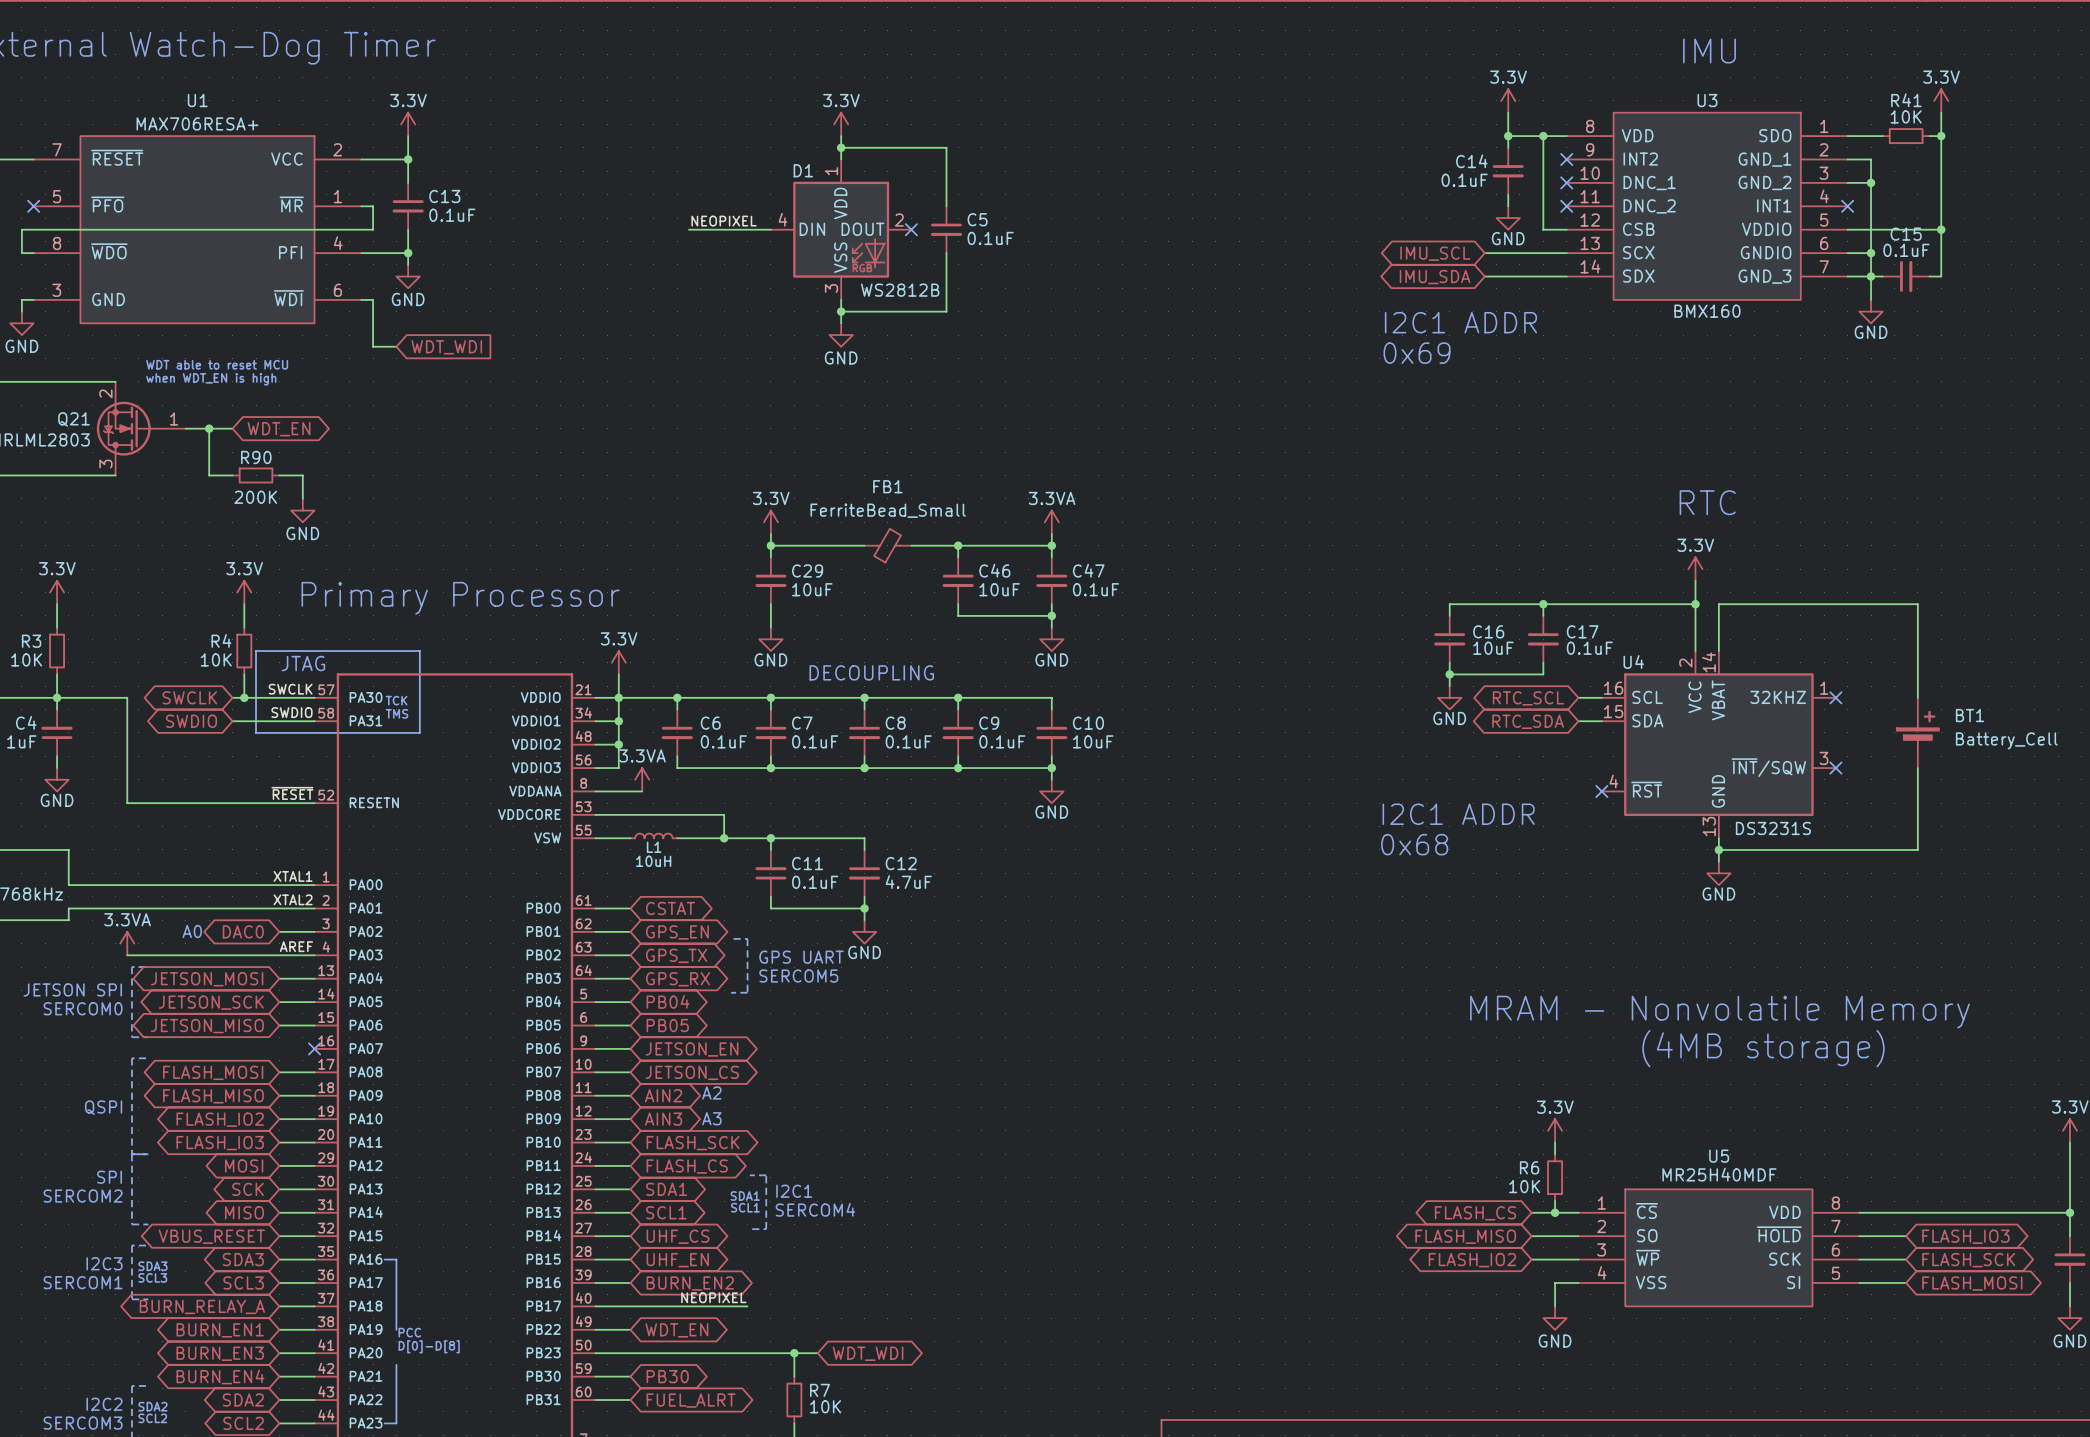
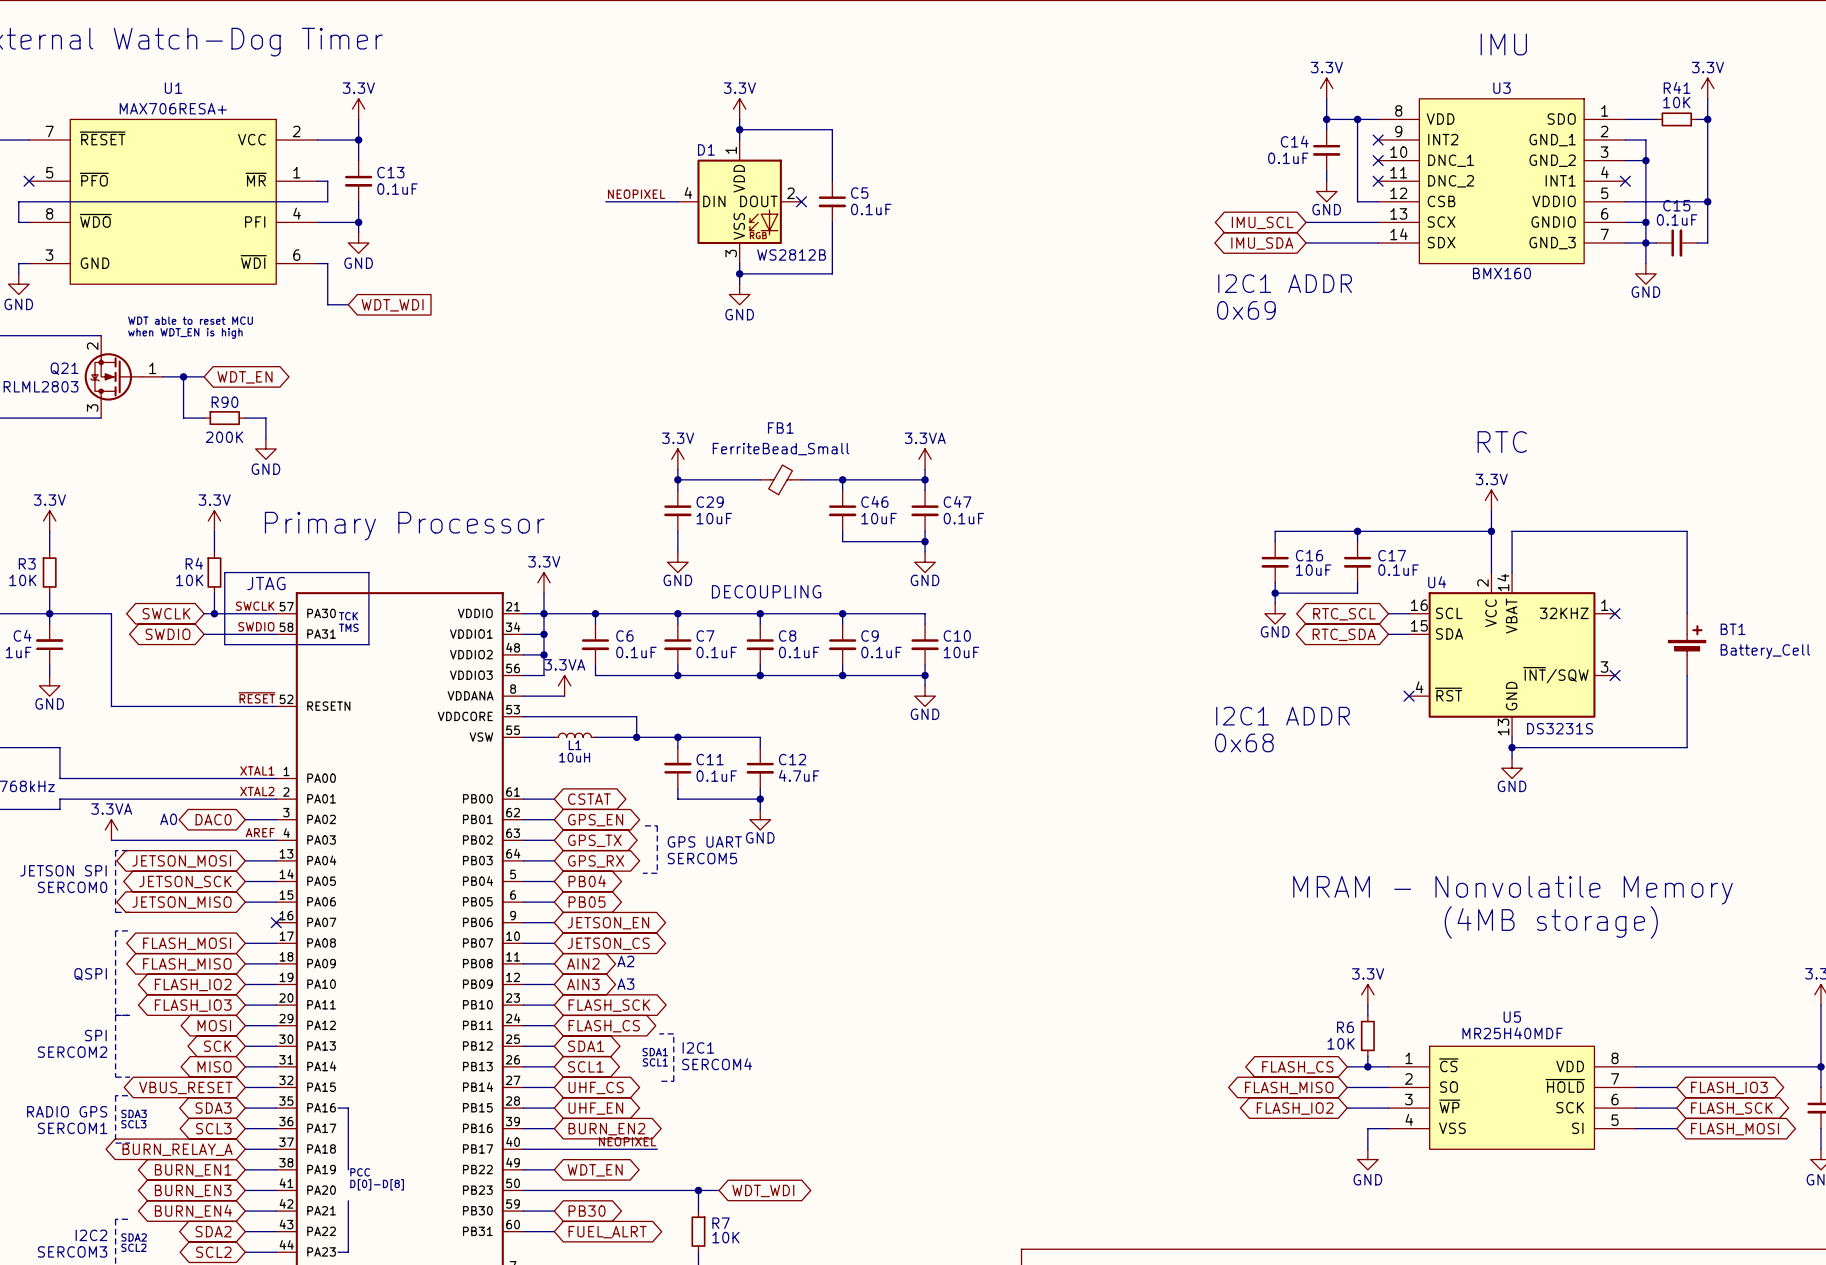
text: I2C3 (104, 1263) -> RADIO GPS (67, 1111)

